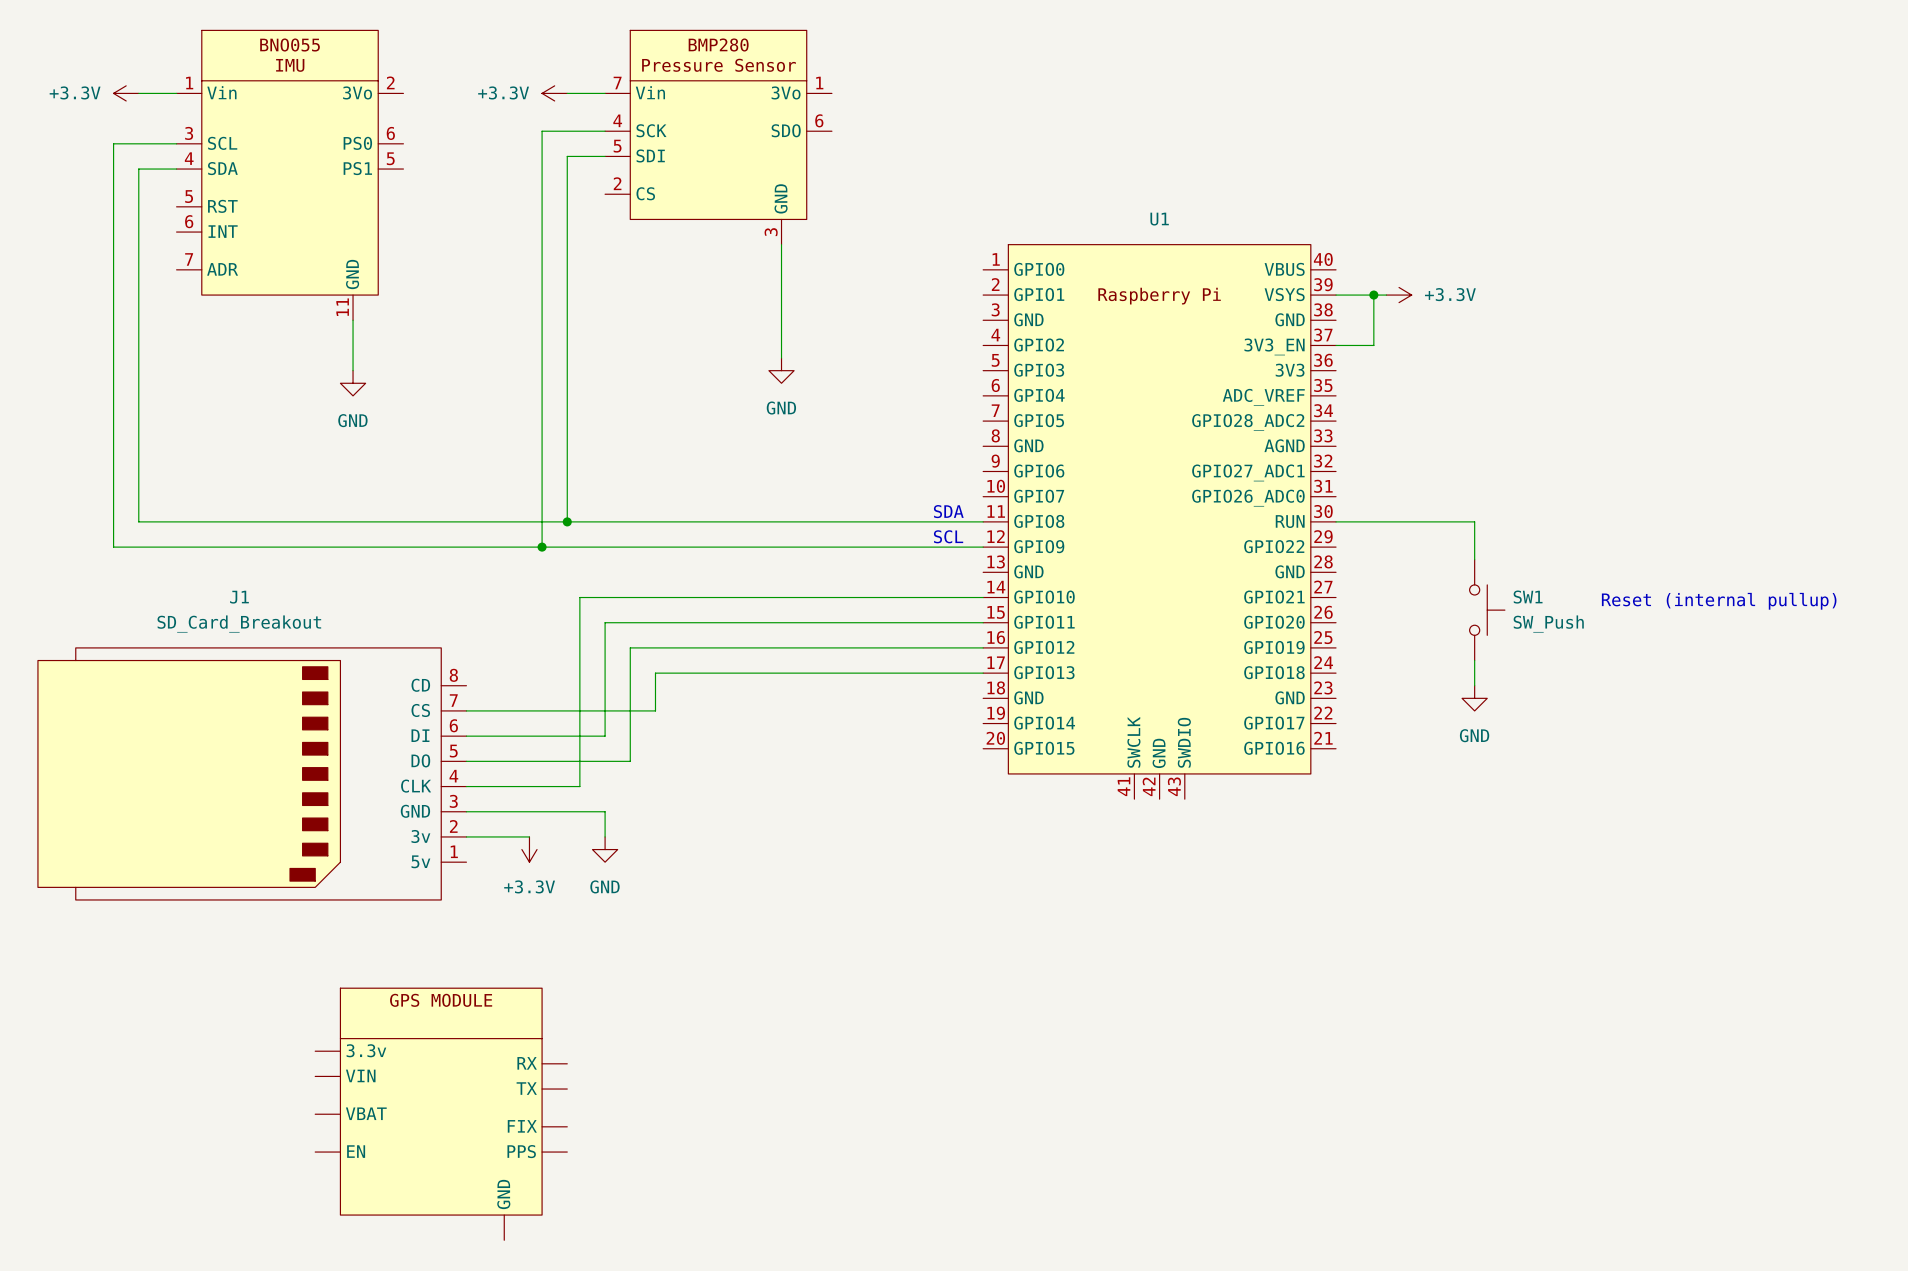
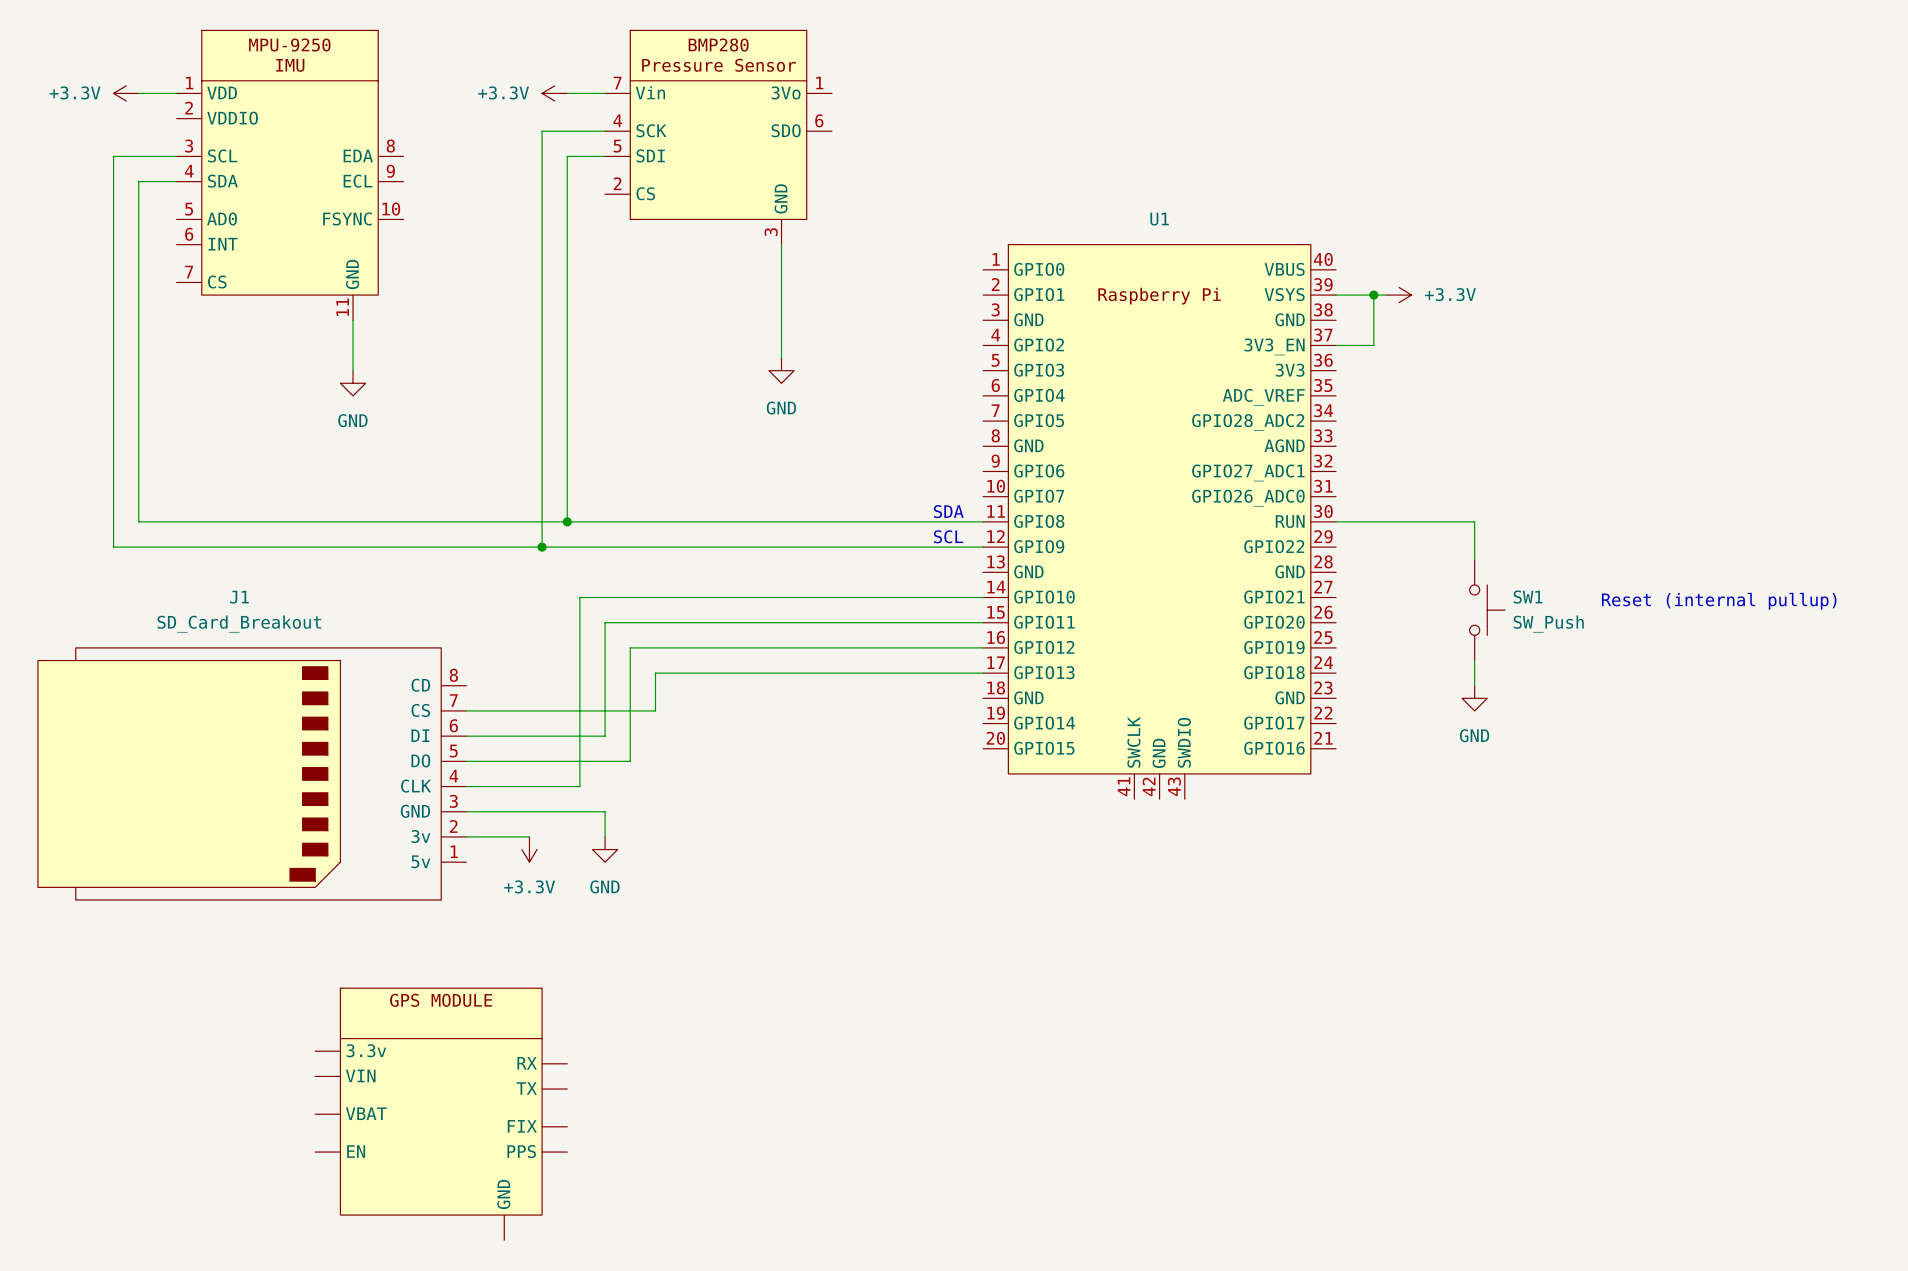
part symbol: [176, 30, 404, 321] -> [176, 30, 404, 321]
wire: (176, 143) (113, 143) (113, 156) -> (176, 156) (113, 156)
wire: (176, 169) (138, 169) (138, 181) -> (176, 181) (138, 181)

